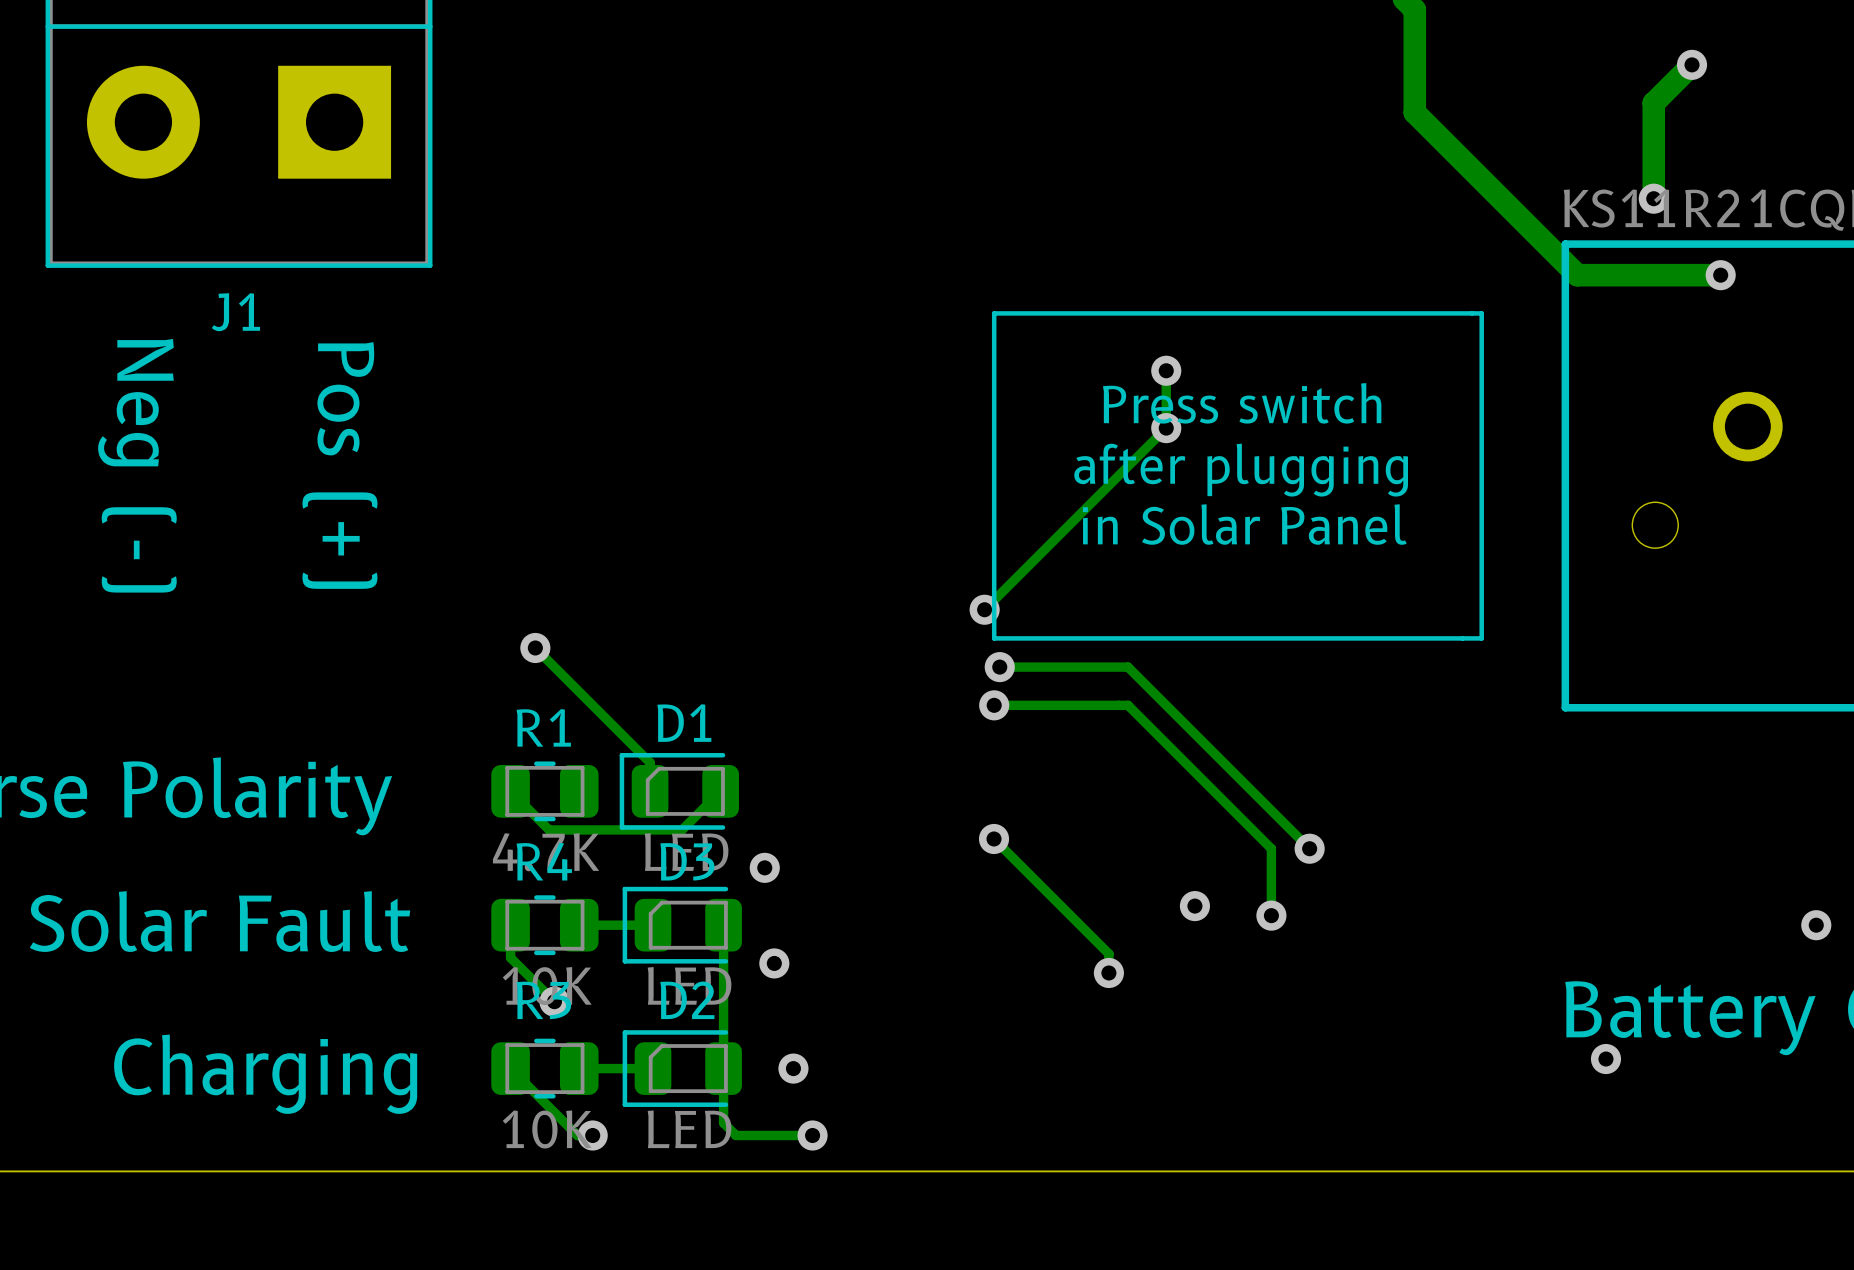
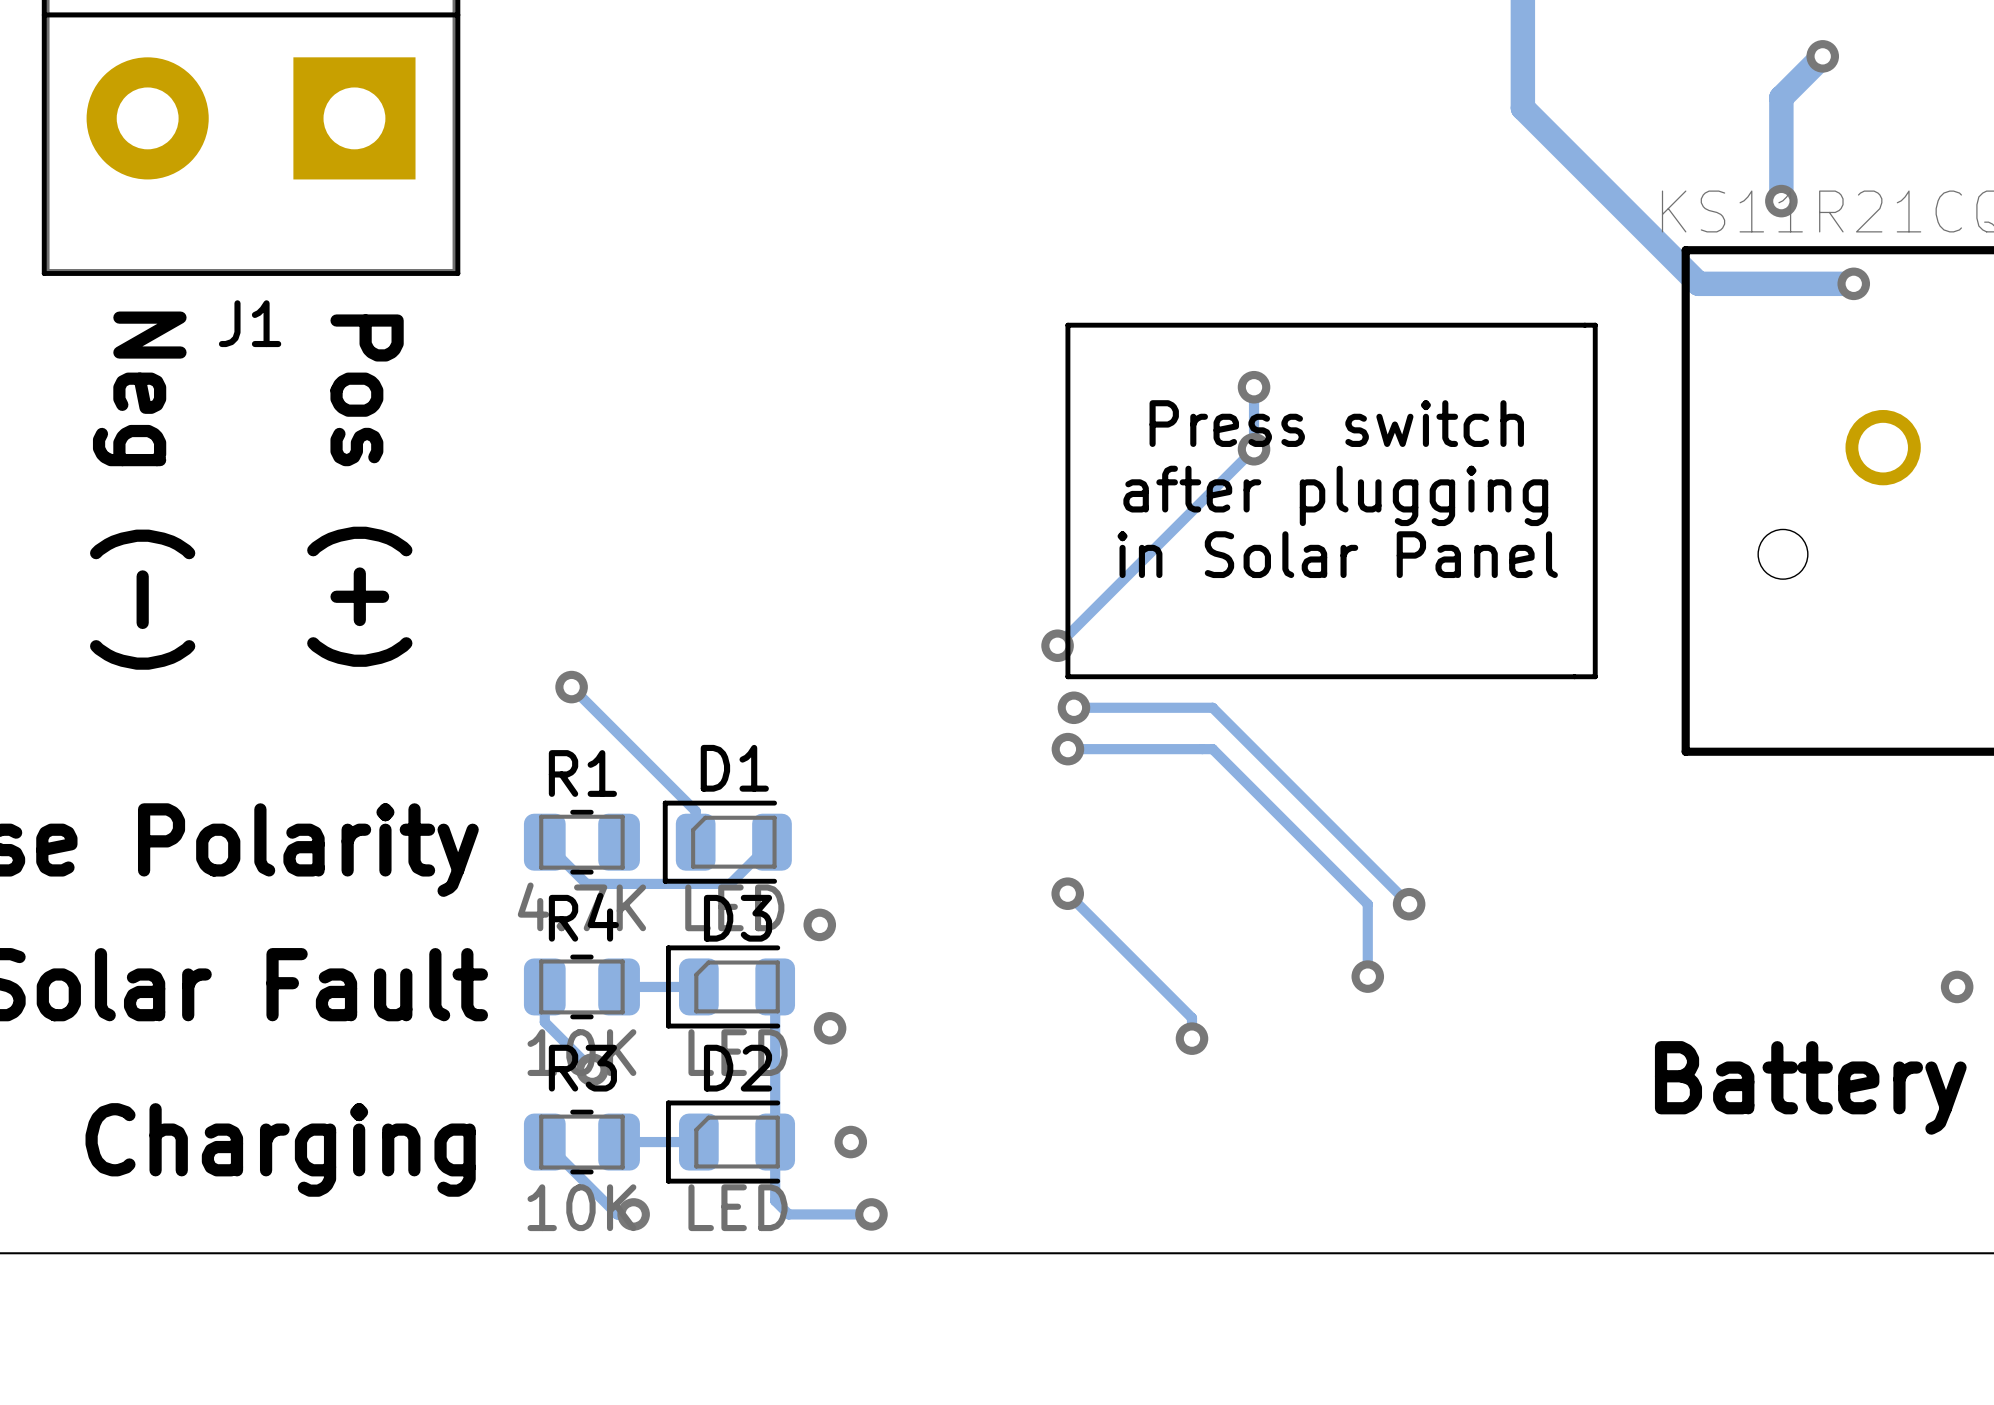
via: (1194, 906) -> none
via: (1605, 1059) -> none

